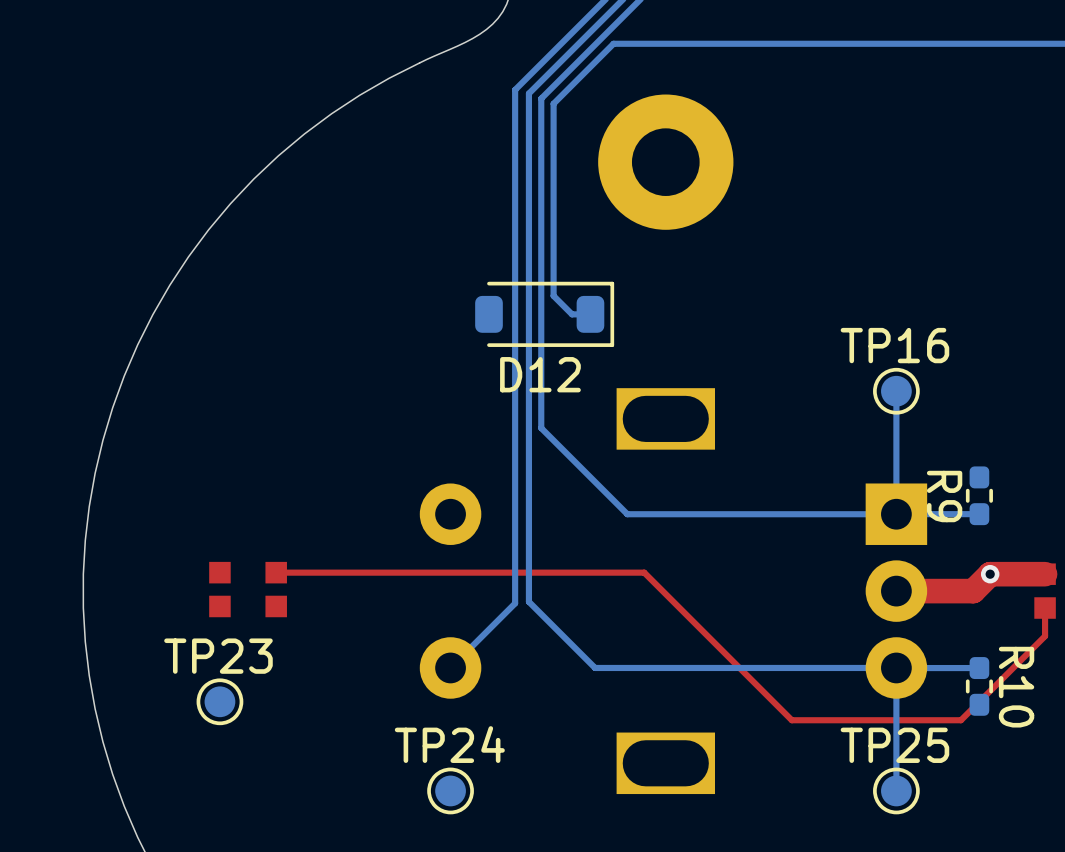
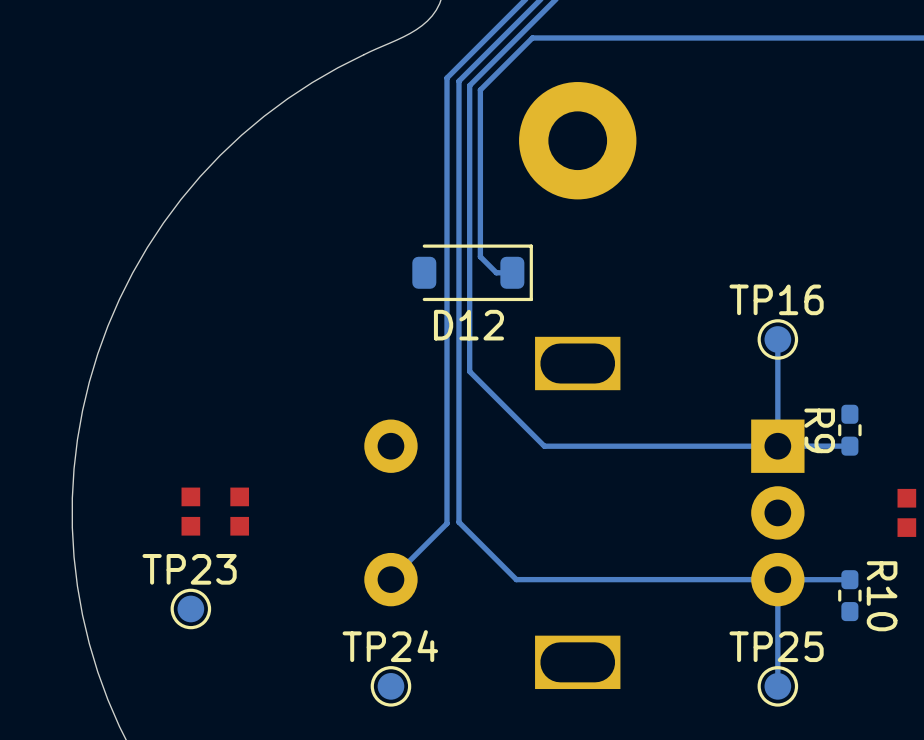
top track: (276, 572) (644, 572) (791, 720) (960, 720) (1045, 636) (1045, 608) -> none
via: (990, 574) -> none
top track: (1045, 574) (990, 574) (973, 591) (896, 591) -> none

